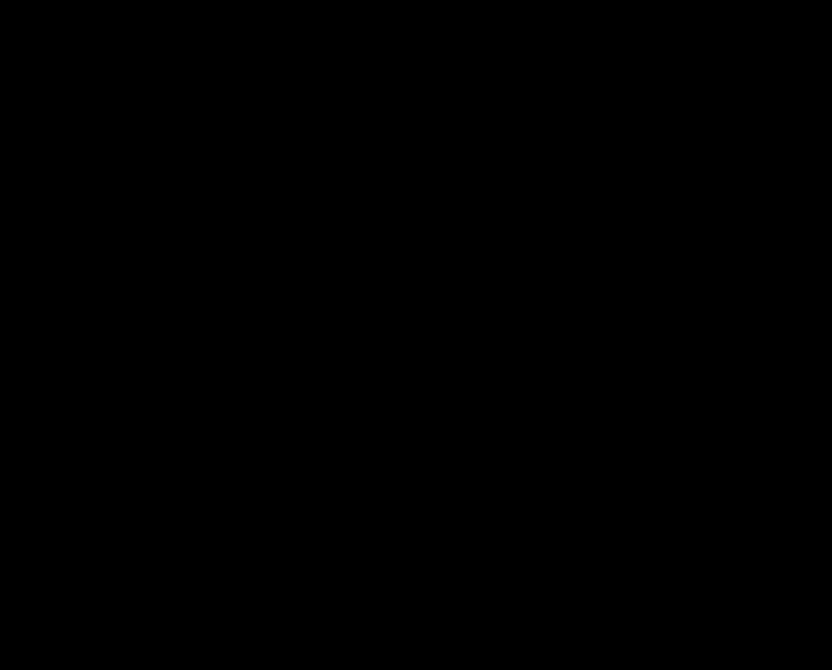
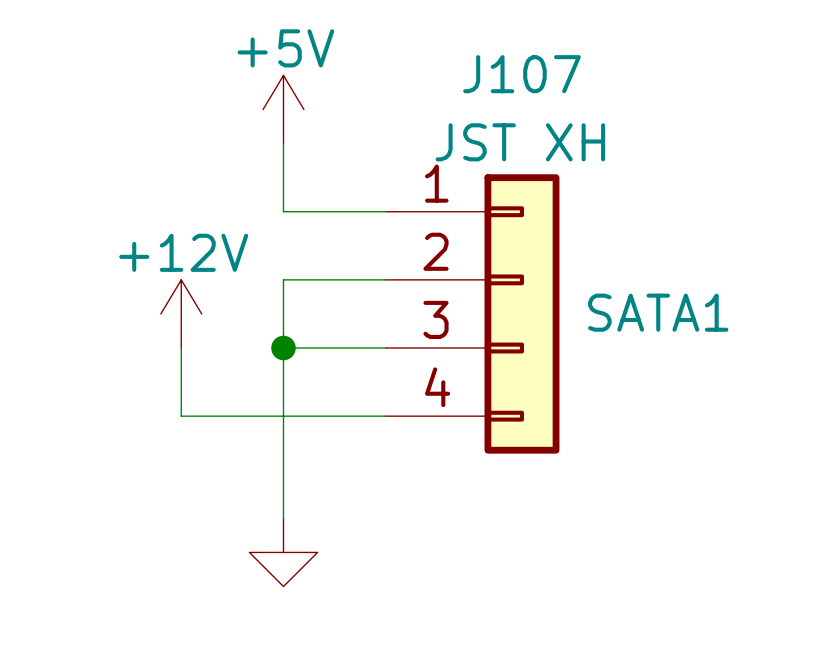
power symbol: none -> +5V (283, 109)
wire: none -> (283, 143) (283, 211) (385, 211)
wire: none -> (385, 279) (283, 279) (283, 518)
power symbol: none -> +12V (181, 313)
J107: none -> JST XH (472, 313)
wire: none -> (181, 348) (181, 416) (385, 416)
wire: none -> (283, 348) (385, 348)
junction: none -> (283, 348)
power symbol: none -> (283, 552)

